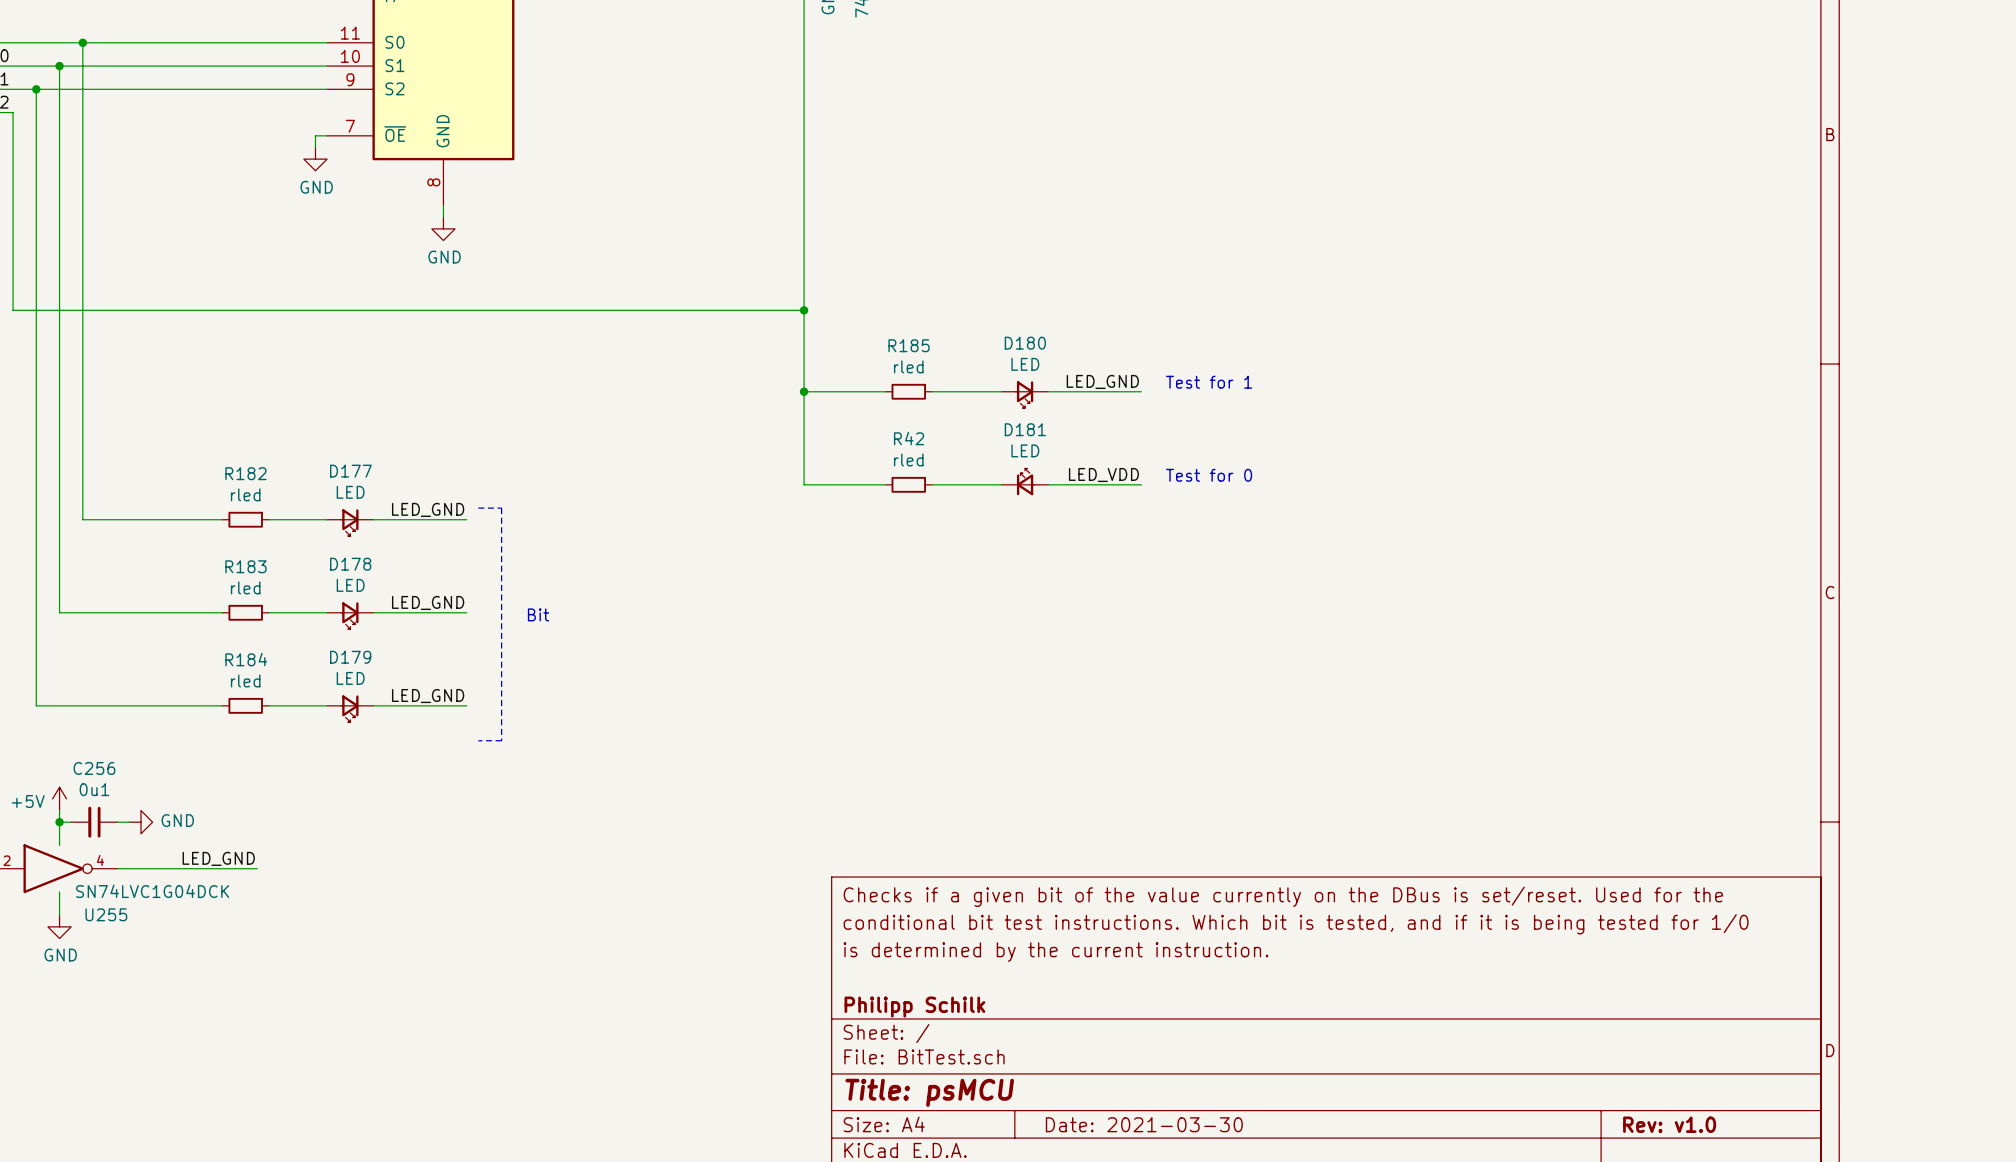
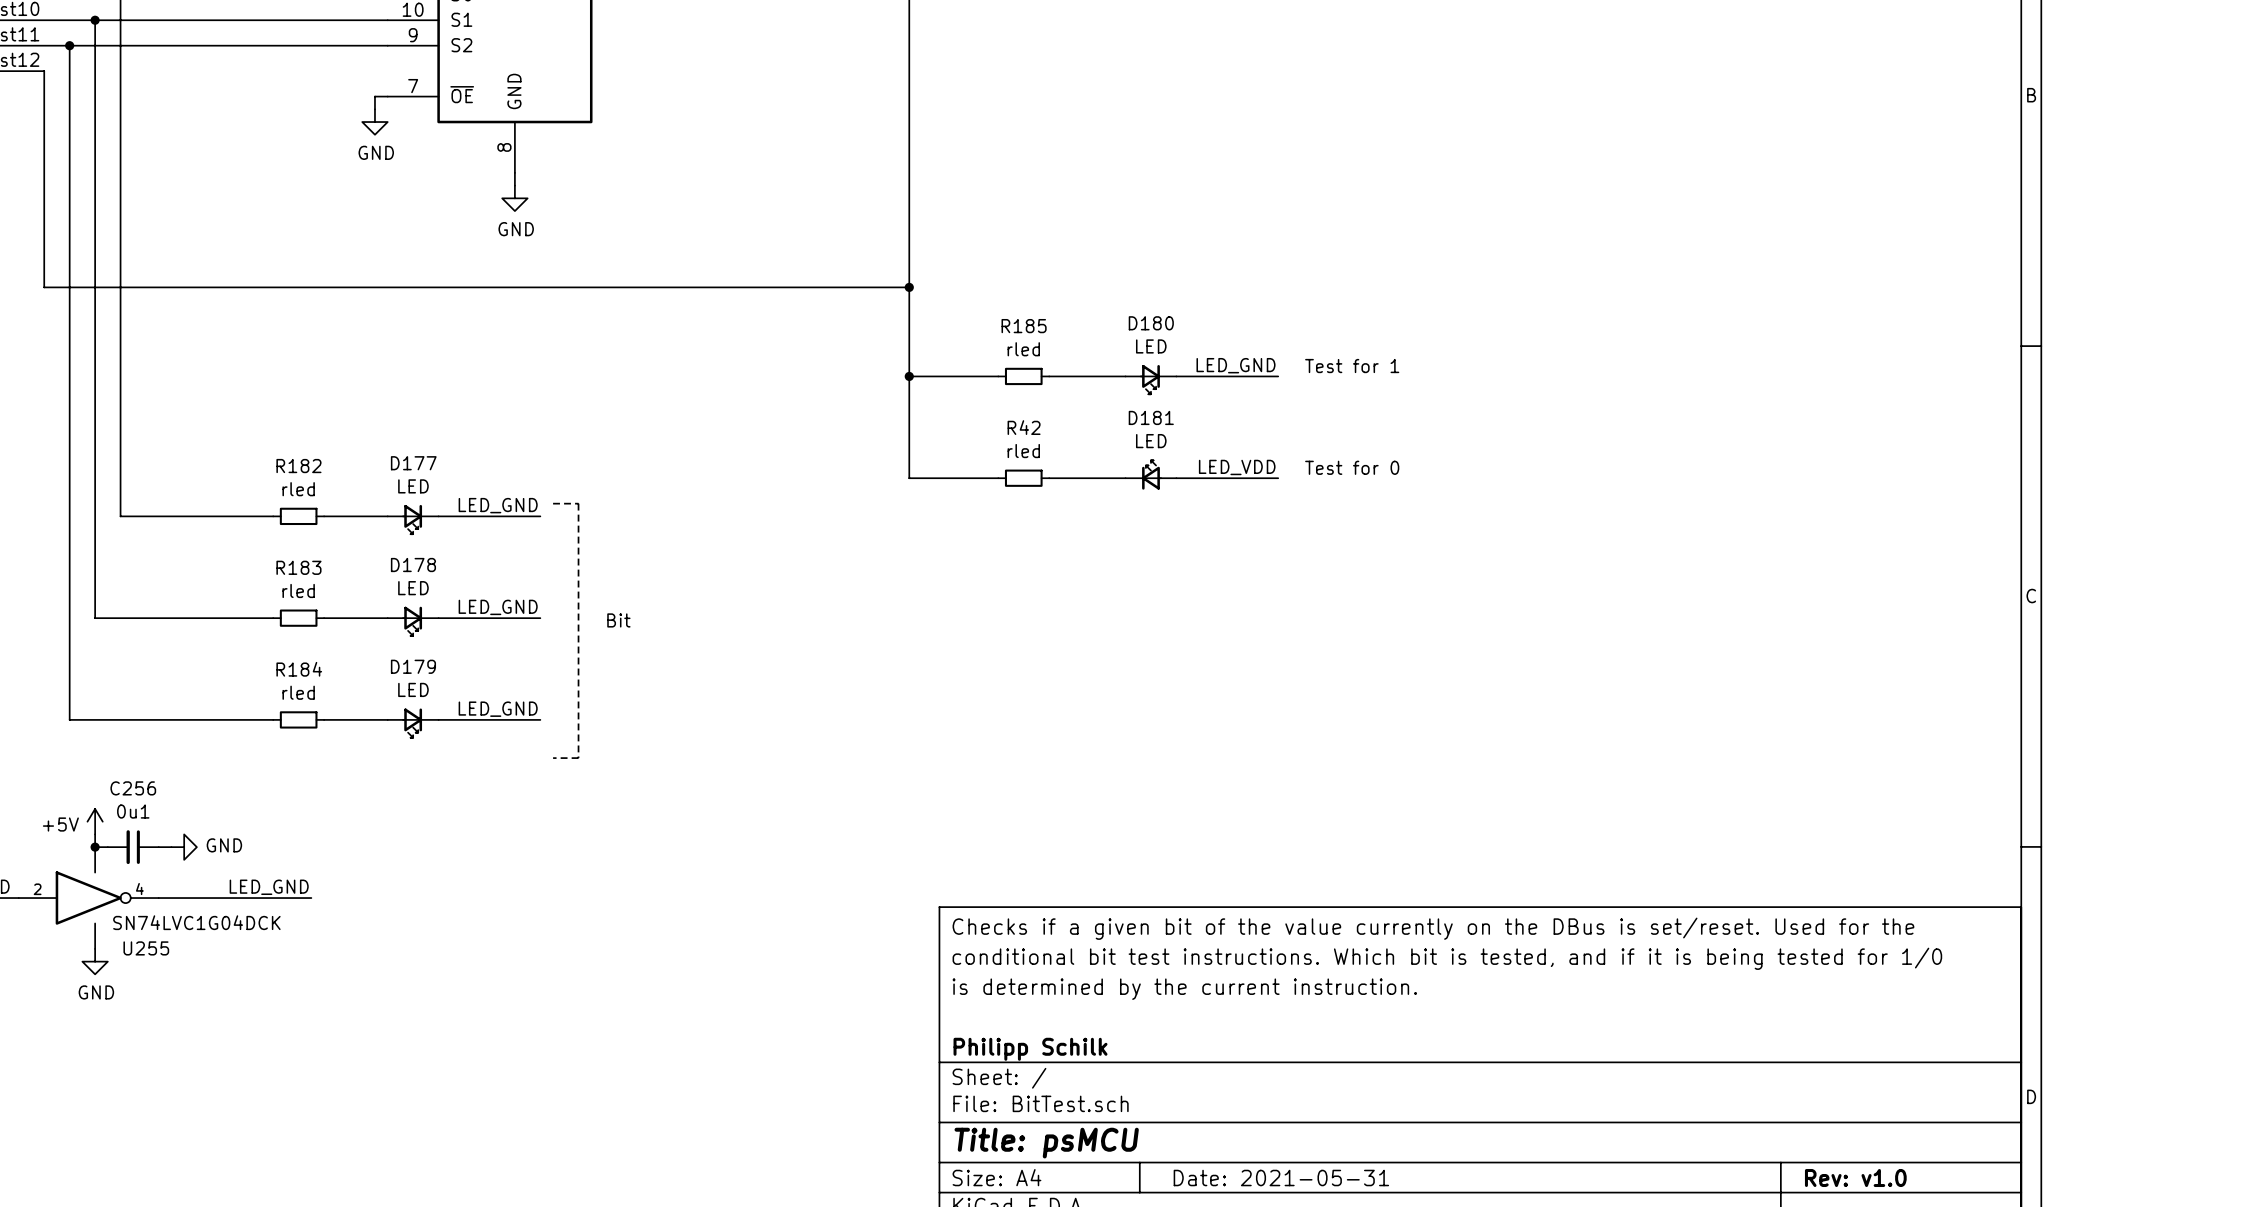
title block: Date: 2021-03-30 (1144, 1124) -> Date: 2021-05-31 (1281, 1178)

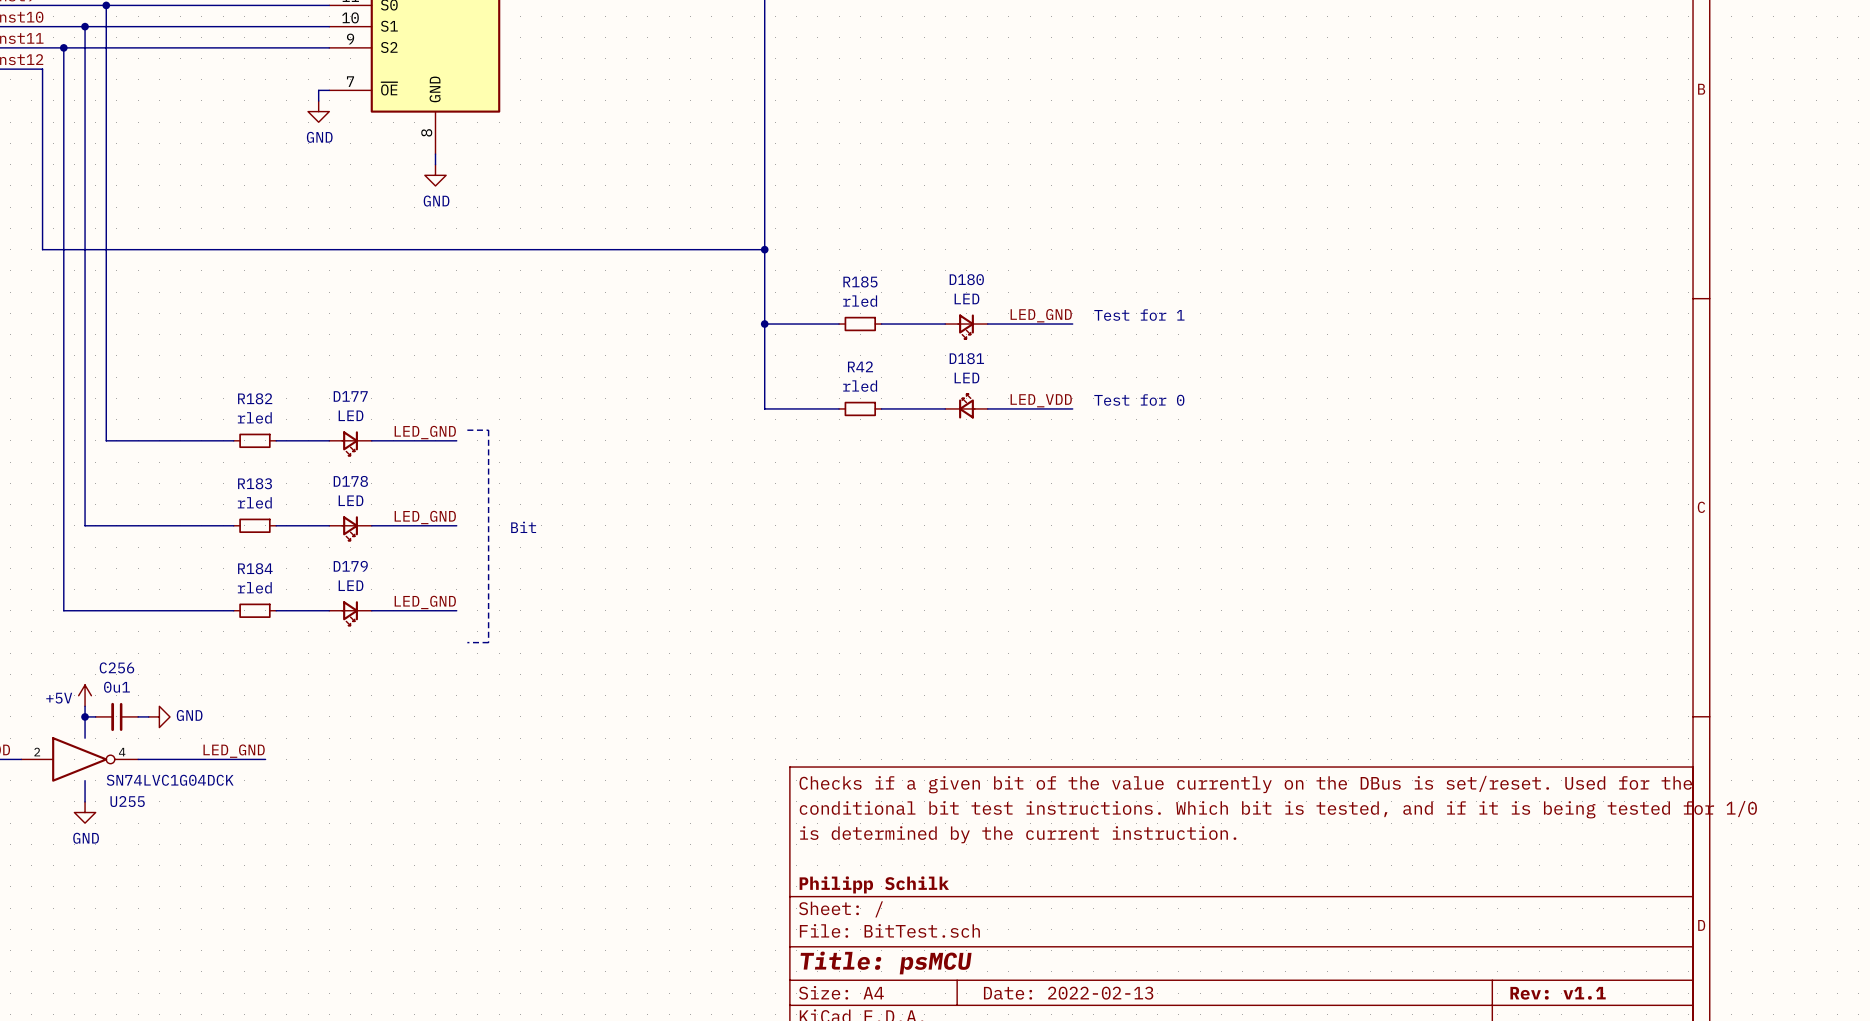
title block: Date: 2021-05-31 (1281, 1178) -> Date: 2022-02-13 (1068, 993)
title block: Rev: v1.0 (1855, 1178) -> Rev: v1.1 (1558, 993)

